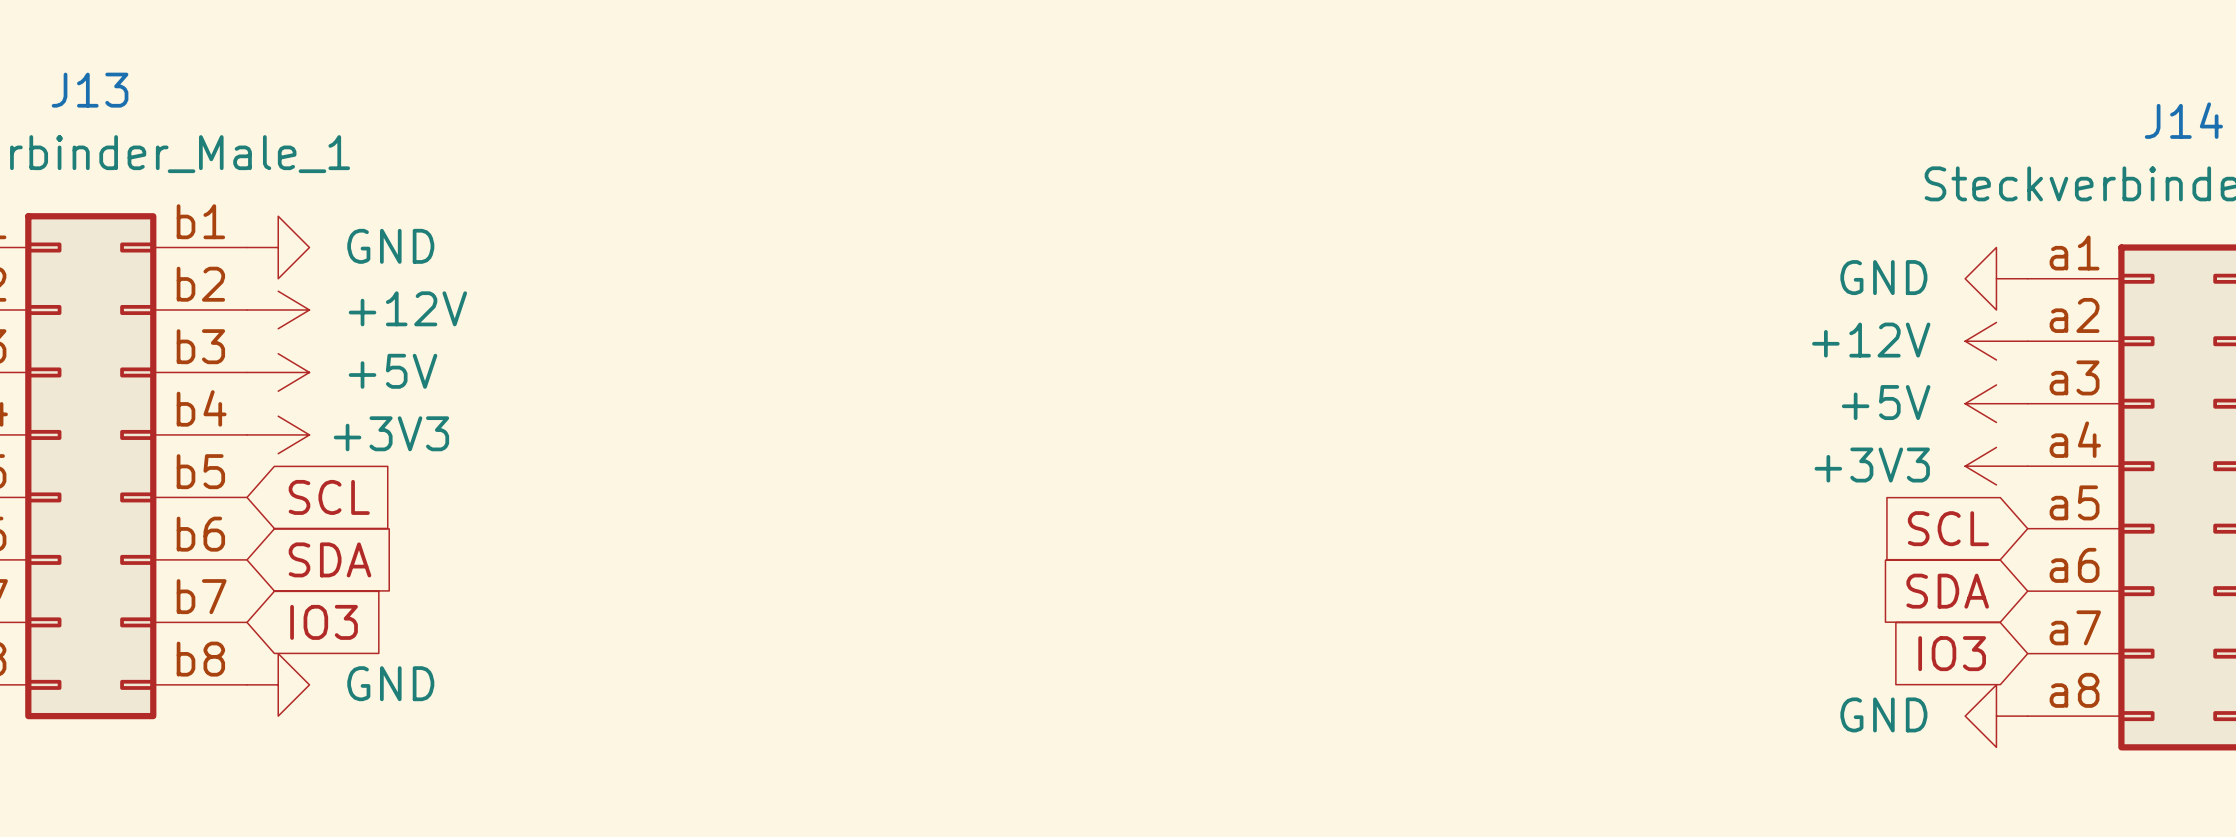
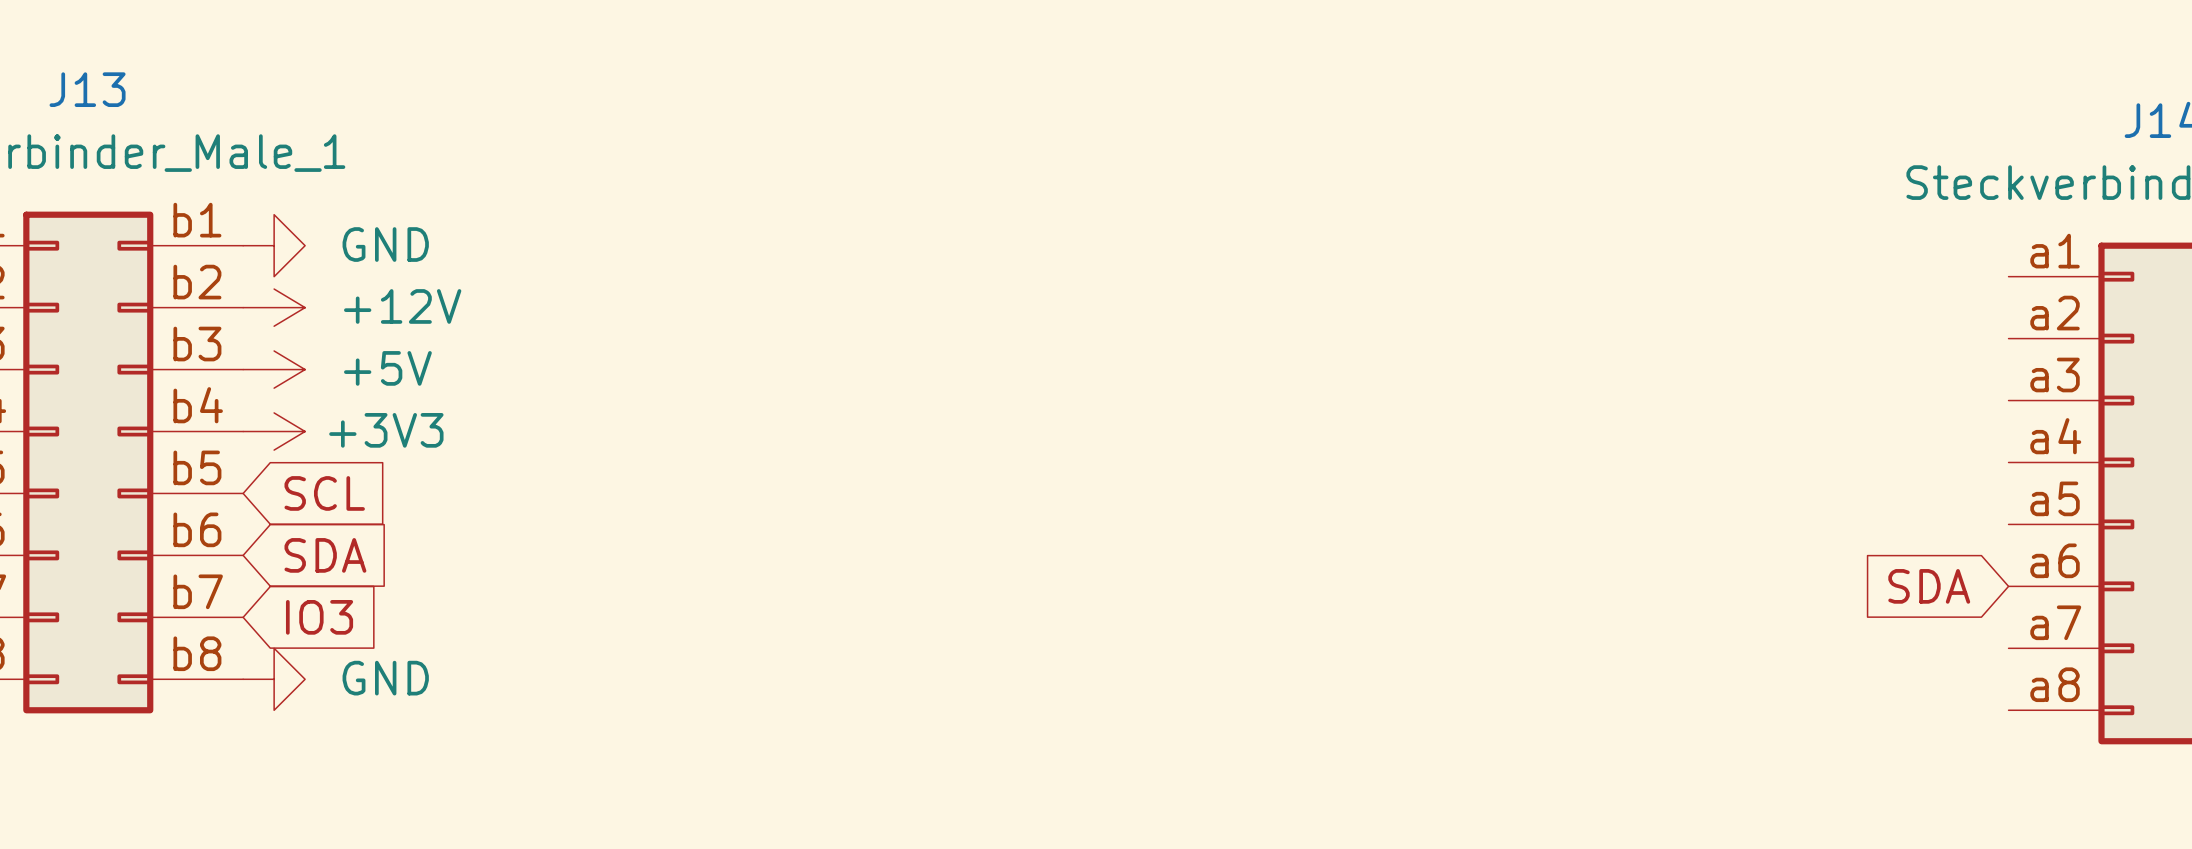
power symbol: GND (1996, 278) -> none
power symbol: +12V (1996, 341) -> none
power symbol: +5V (1996, 403) -> none
power symbol: +3V3 (1996, 466) -> none
global label: SCL (1948, 528) -> none
global label: IO3 (1952, 653) -> none
power symbol: GND (1996, 716) -> none

